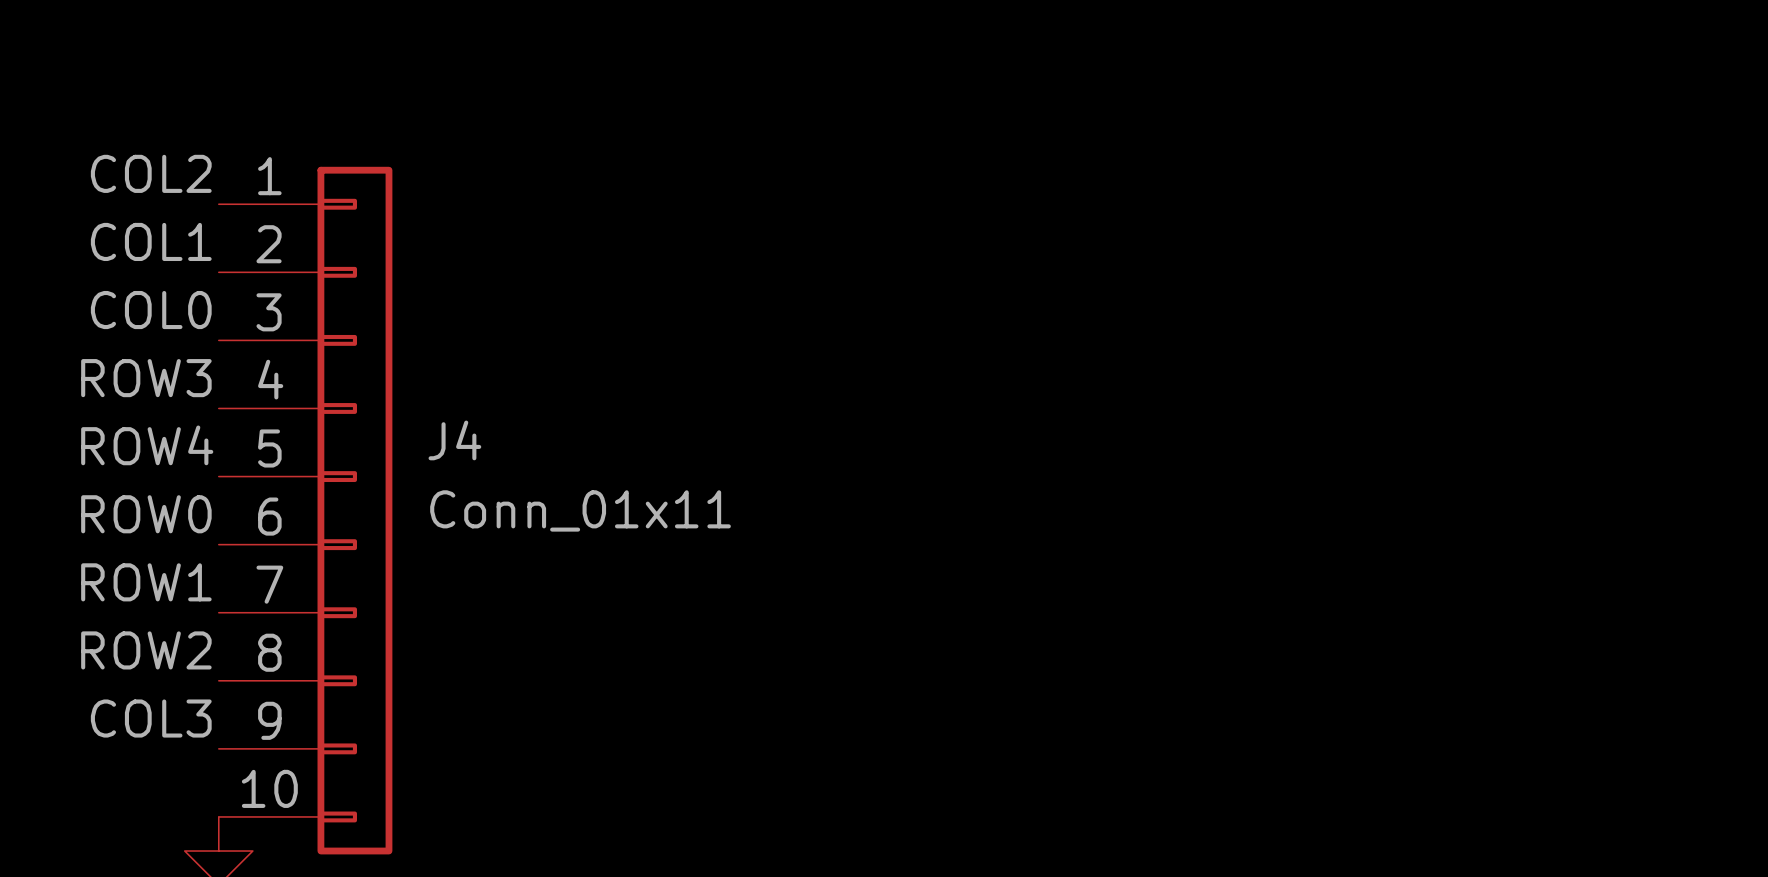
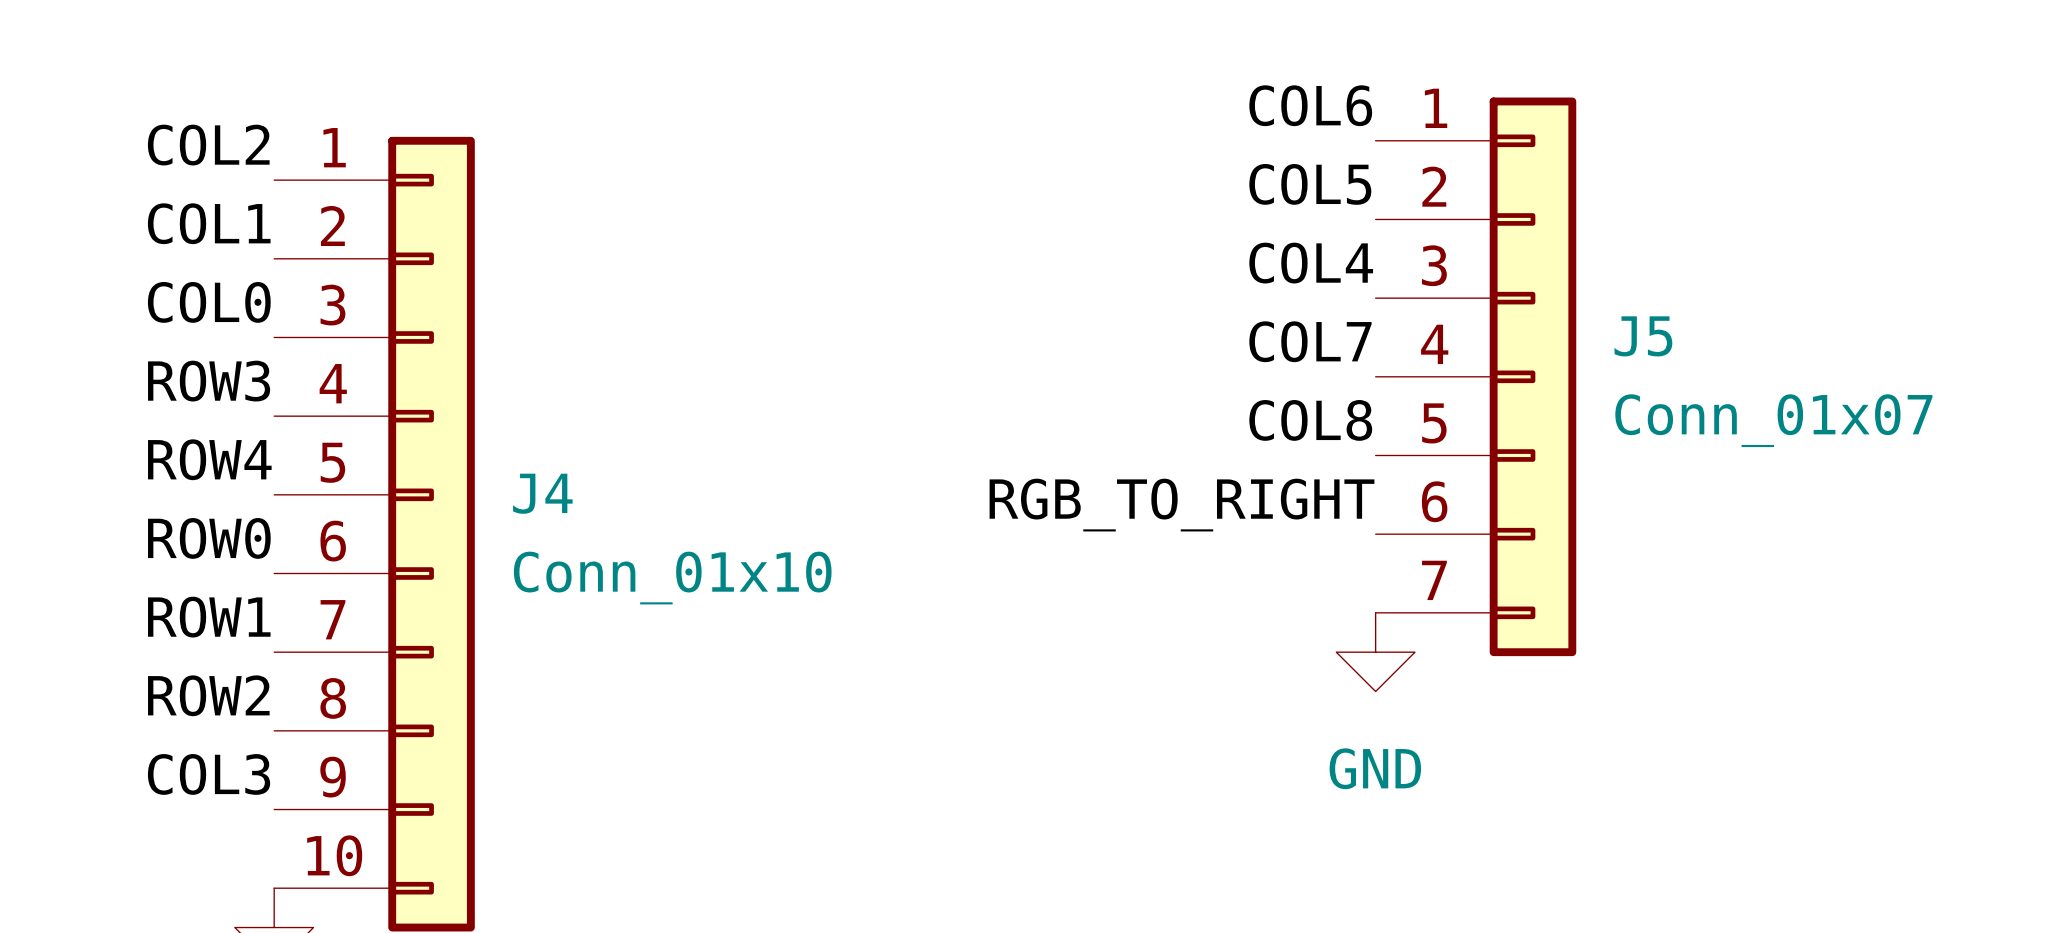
label: none -> COL6 (1310, 105)
label: none -> COL5 (1310, 184)
label: none -> COL4 (1311, 263)
label: none -> COL7 (1310, 341)
J5: none -> Conn_01x07 (1475, 376)
label: none -> COL8 (1310, 420)
J4 name position: J4 (454, 440) -> J4 (542, 493)
label: none -> RGB_TO_RIGHT (1181, 505)
J4 value: Conn_01x11 (580, 510) -> Conn_01x10 (672, 578)
power symbol: none -> GND (1375, 652)

